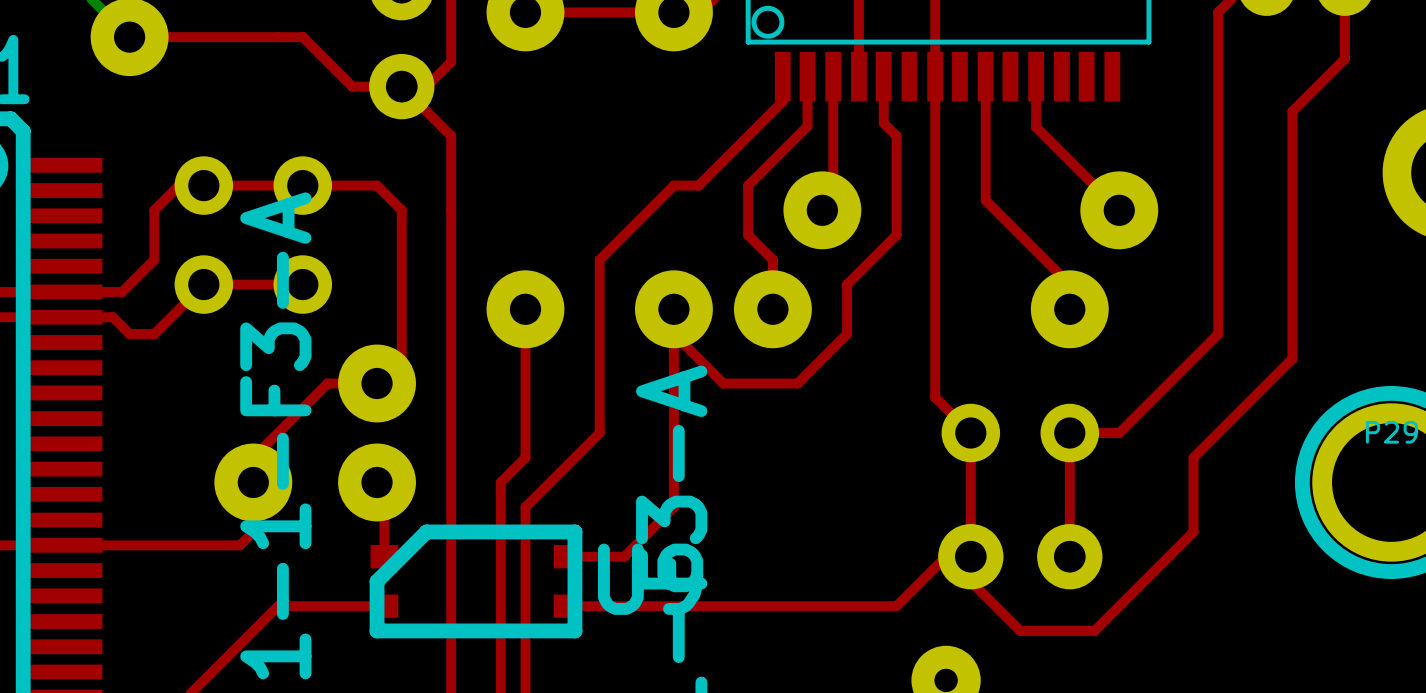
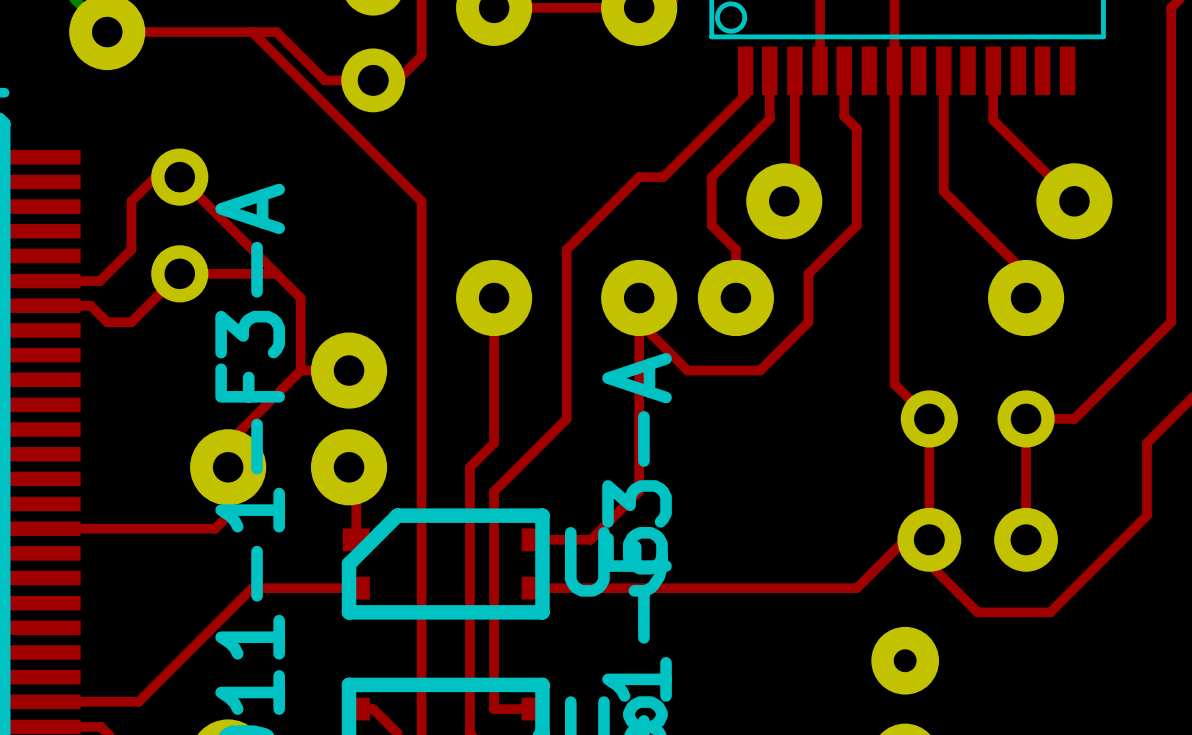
top track: (401, 86) (451, 136) (451, 210) -> (252, 32) (421, 201)
top track: (203, 185) (377, 185) (401, 210) (401, 358) (377, 383) -> (179, 177) (300, 298) (300, 370)
part: (302, 235) -> none

